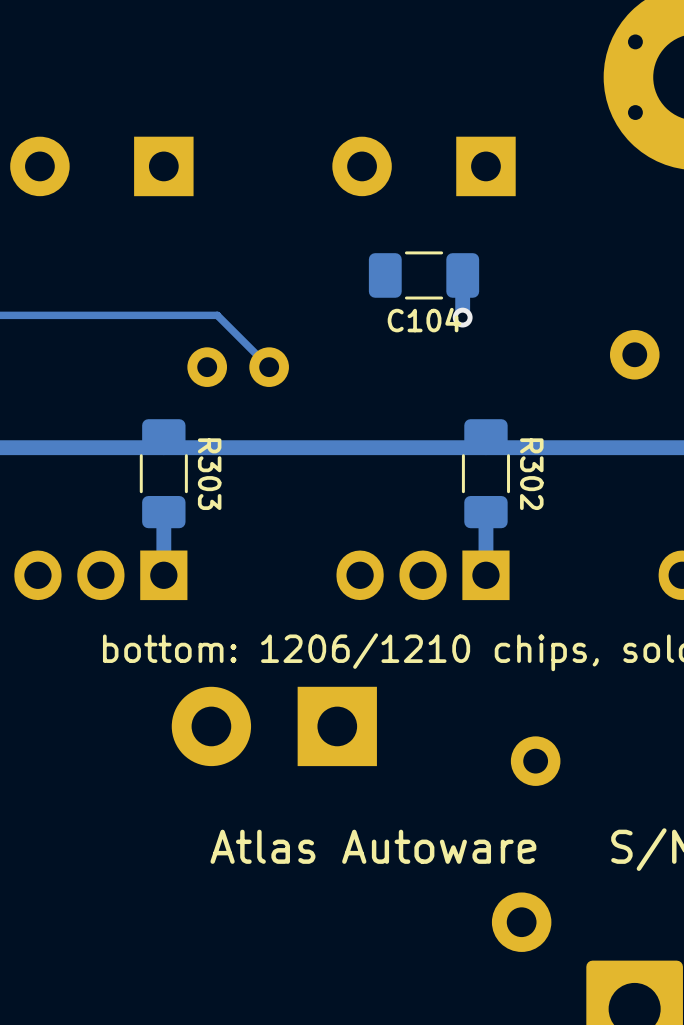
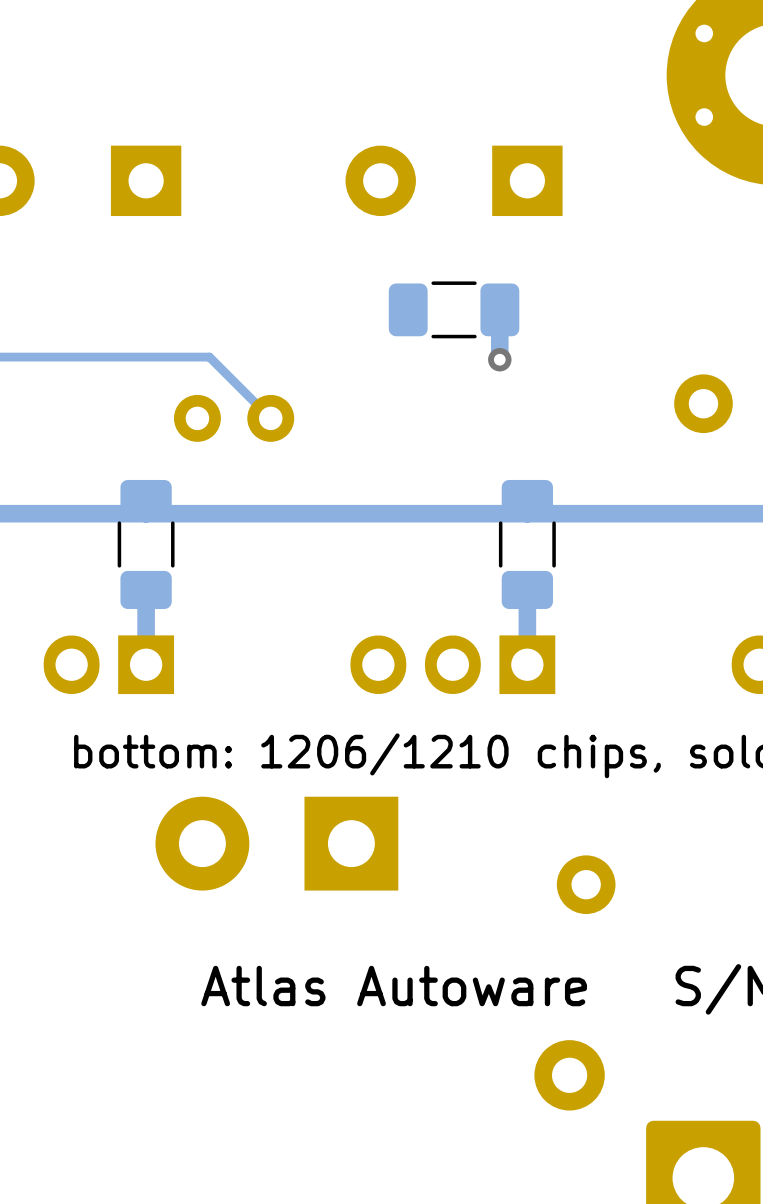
C104 name: C104 (424, 320) -> none
R303 name: R303 (209, 474) -> none
R302 name: R302 (531, 474) -> none

